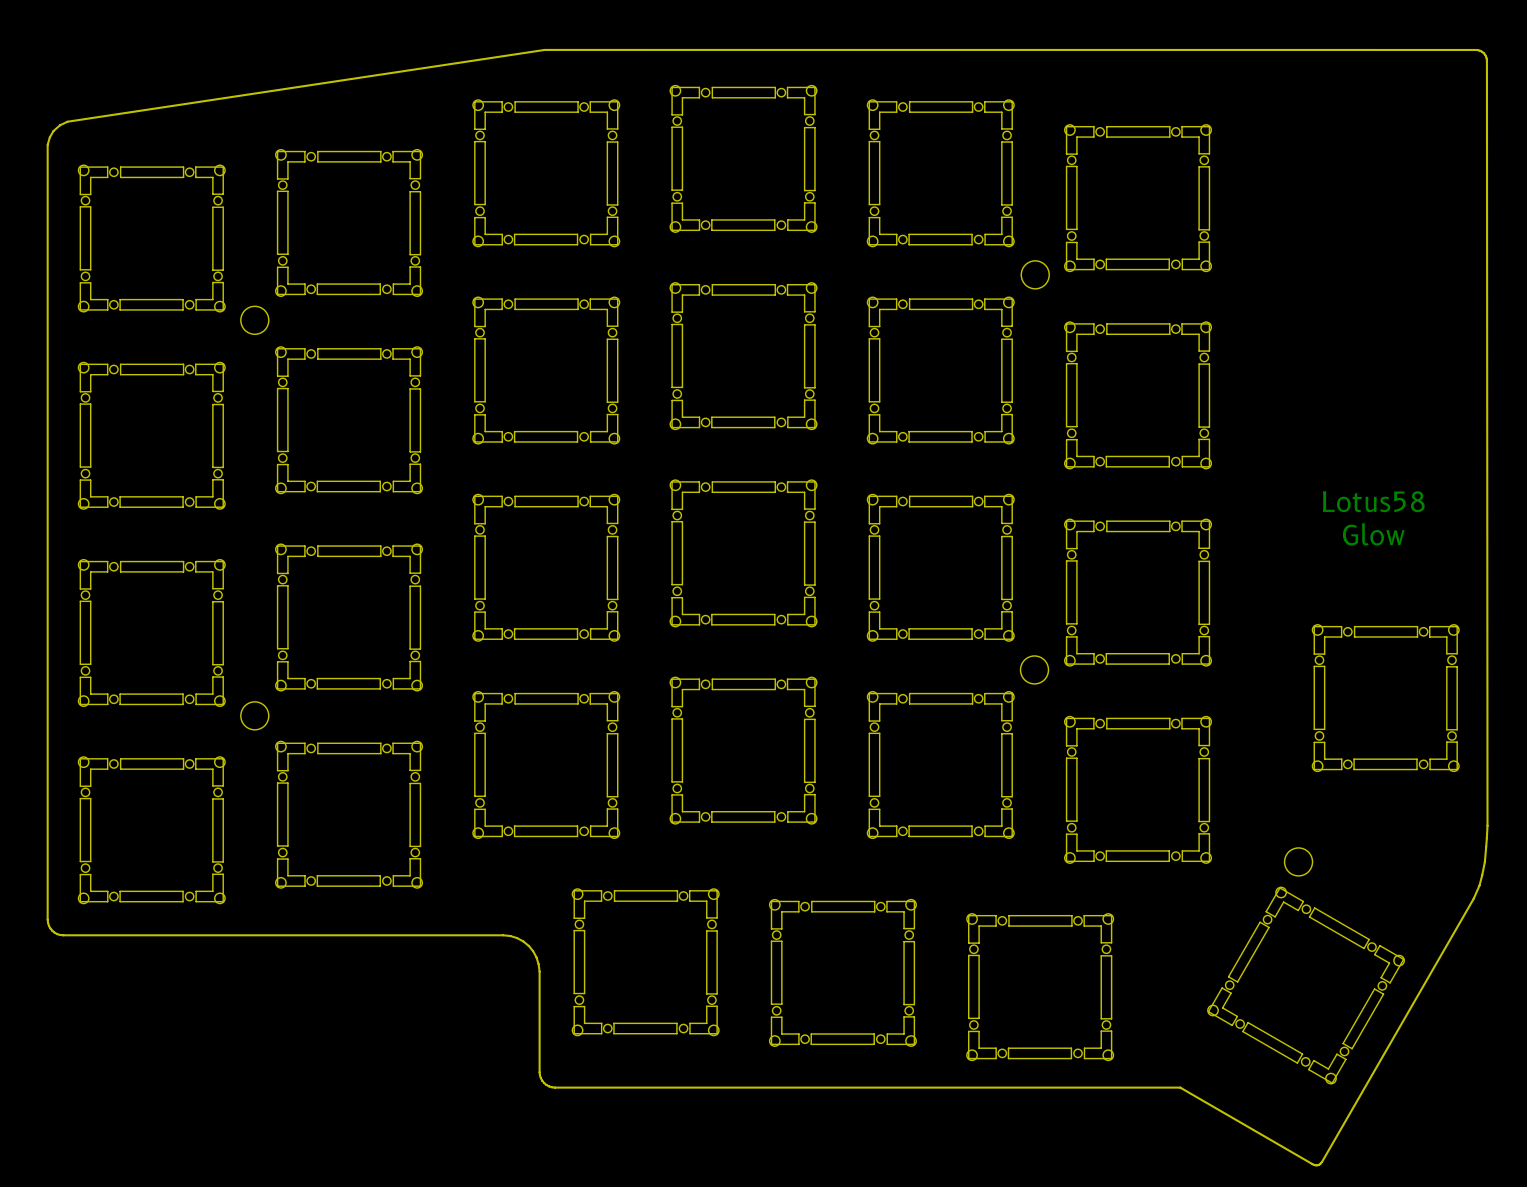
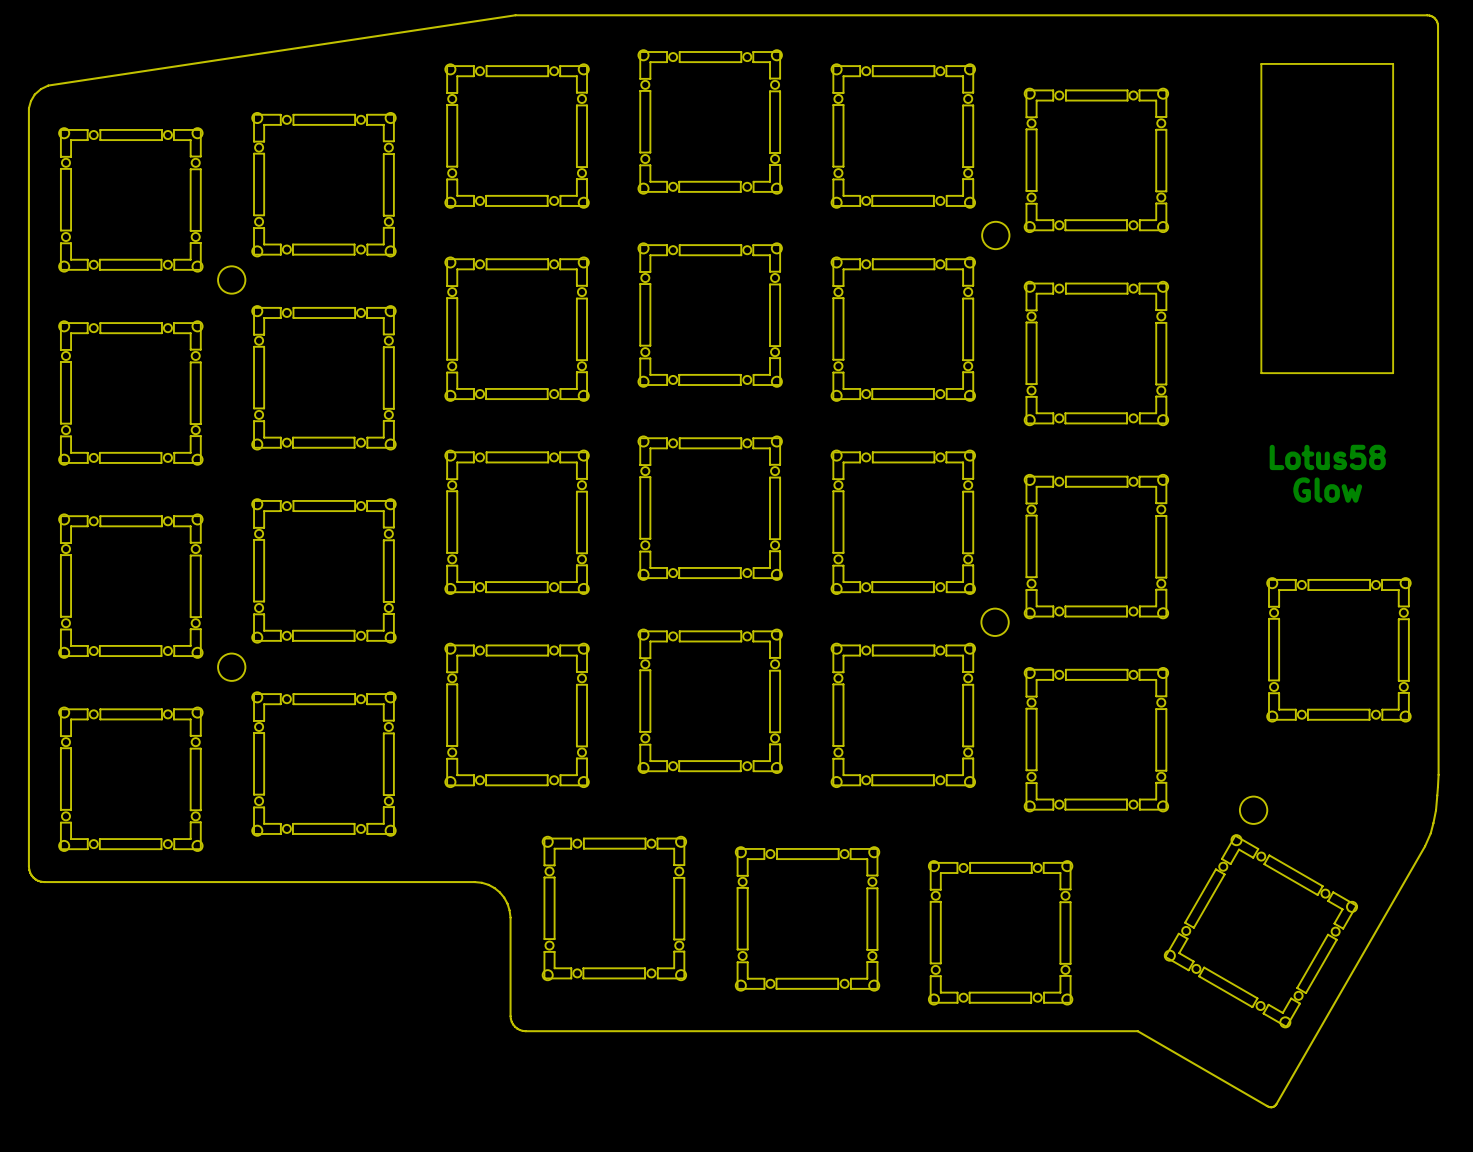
board edge: none -> (1393, 63) (1393, 373) (1261, 373) (1261, 63) (1393, 63)

